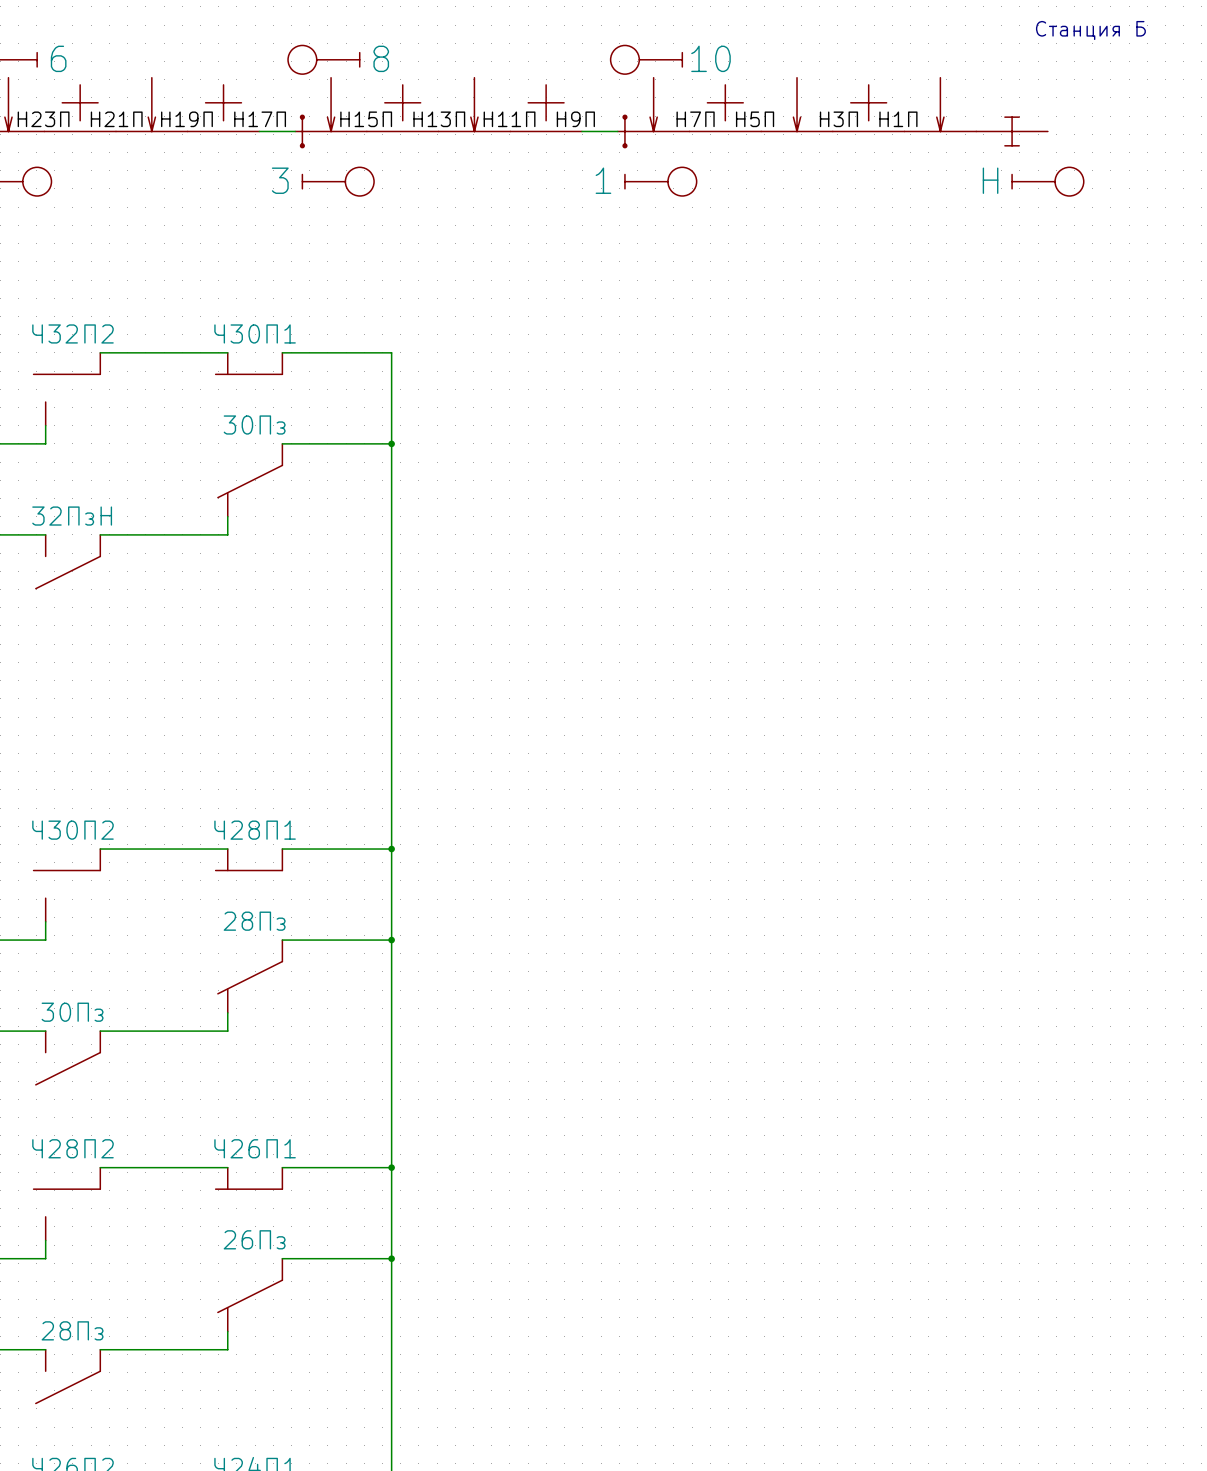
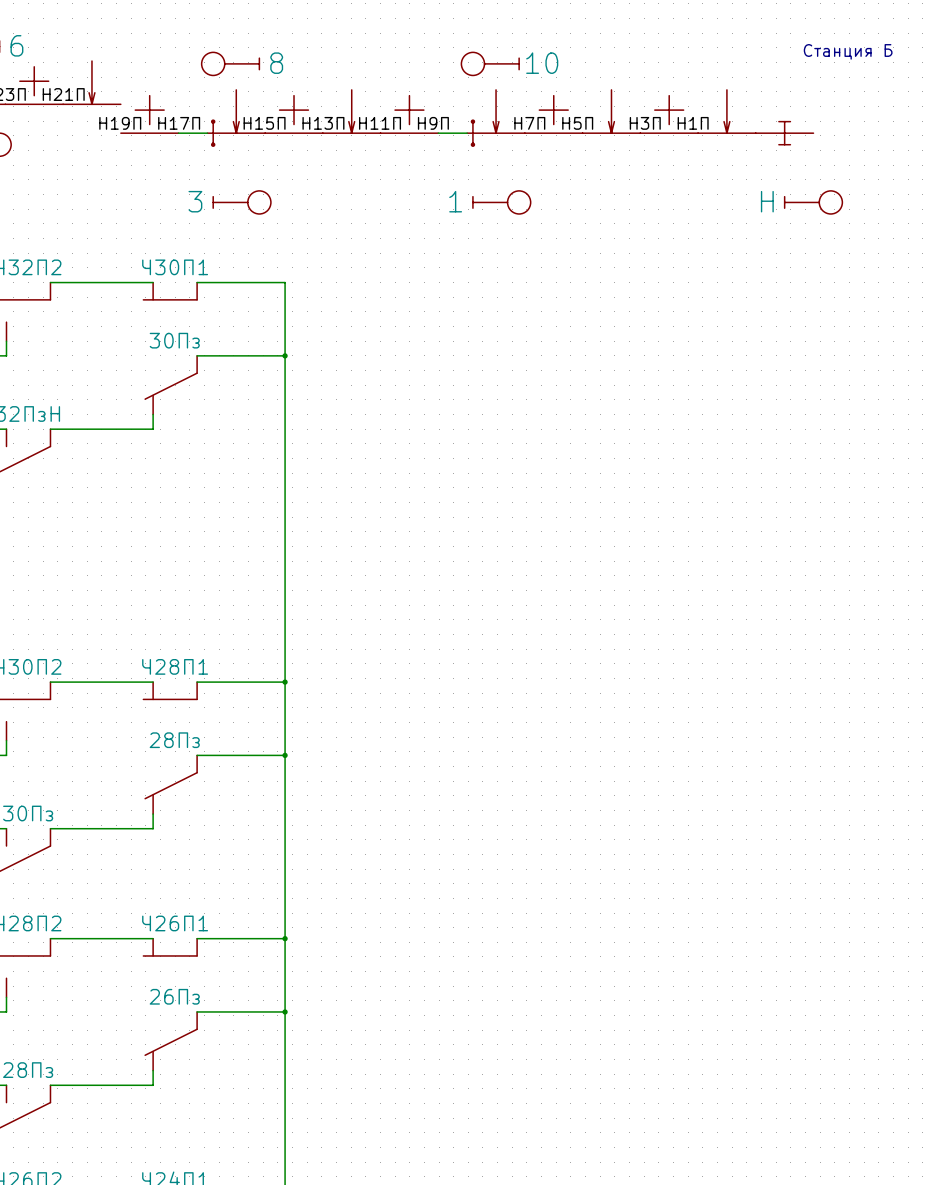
text position: Станция Б (1090, 30) -> Станция Б (848, 51)
part position: (323, 59) -> (230, 63)
part position: (646, 59) -> (490, 63)
part position: (331, 104) -> (236, 111)
part position: (474, 104) -> (351, 111)
part position: (653, 104) -> (496, 111)
part position: (797, 104) -> (611, 111)
part position: (940, 104) -> (726, 111)
part position: (223, 108) -> (149, 114)
part position: (402, 108) -> (294, 114)
part position: (546, 108) -> (409, 114)
part position: (725, 108) -> (553, 114)
part position: (868, 108) -> (669, 114)
label position: Н19П (186, 119) -> Н19П (120, 123)
label position: Н17П (260, 119) -> Н17П (179, 123)
label position: Н15П (366, 119) -> Н15П (264, 123)
label position: Н13П (439, 119) -> Н13П (323, 123)
label position: Н11П (509, 119) -> Н11П (380, 123)
label position: Н9П (575, 119) -> Н9П (433, 123)
label position: Н7П (695, 119) -> Н7П (529, 123)
label position: Н5П (755, 119) -> Н5П (577, 123)
label position: Н3П (838, 119) -> Н3П (645, 123)
label position: Н1П (898, 119) -> Н1П (693, 123)
wire: (259, 131) (295, 131) -> (178, 133) (207, 133)
part position: (302, 131) -> (213, 133)
wire: (581, 131) (617, 131) -> (438, 133) (467, 133)
part position: (624, 131) -> (472, 133)
part position: (1012, 131) -> (784, 133)
part position: (338, 181) -> (242, 202)
part position: (660, 181) -> (501, 202)
part position: (1047, 181) -> (813, 202)

